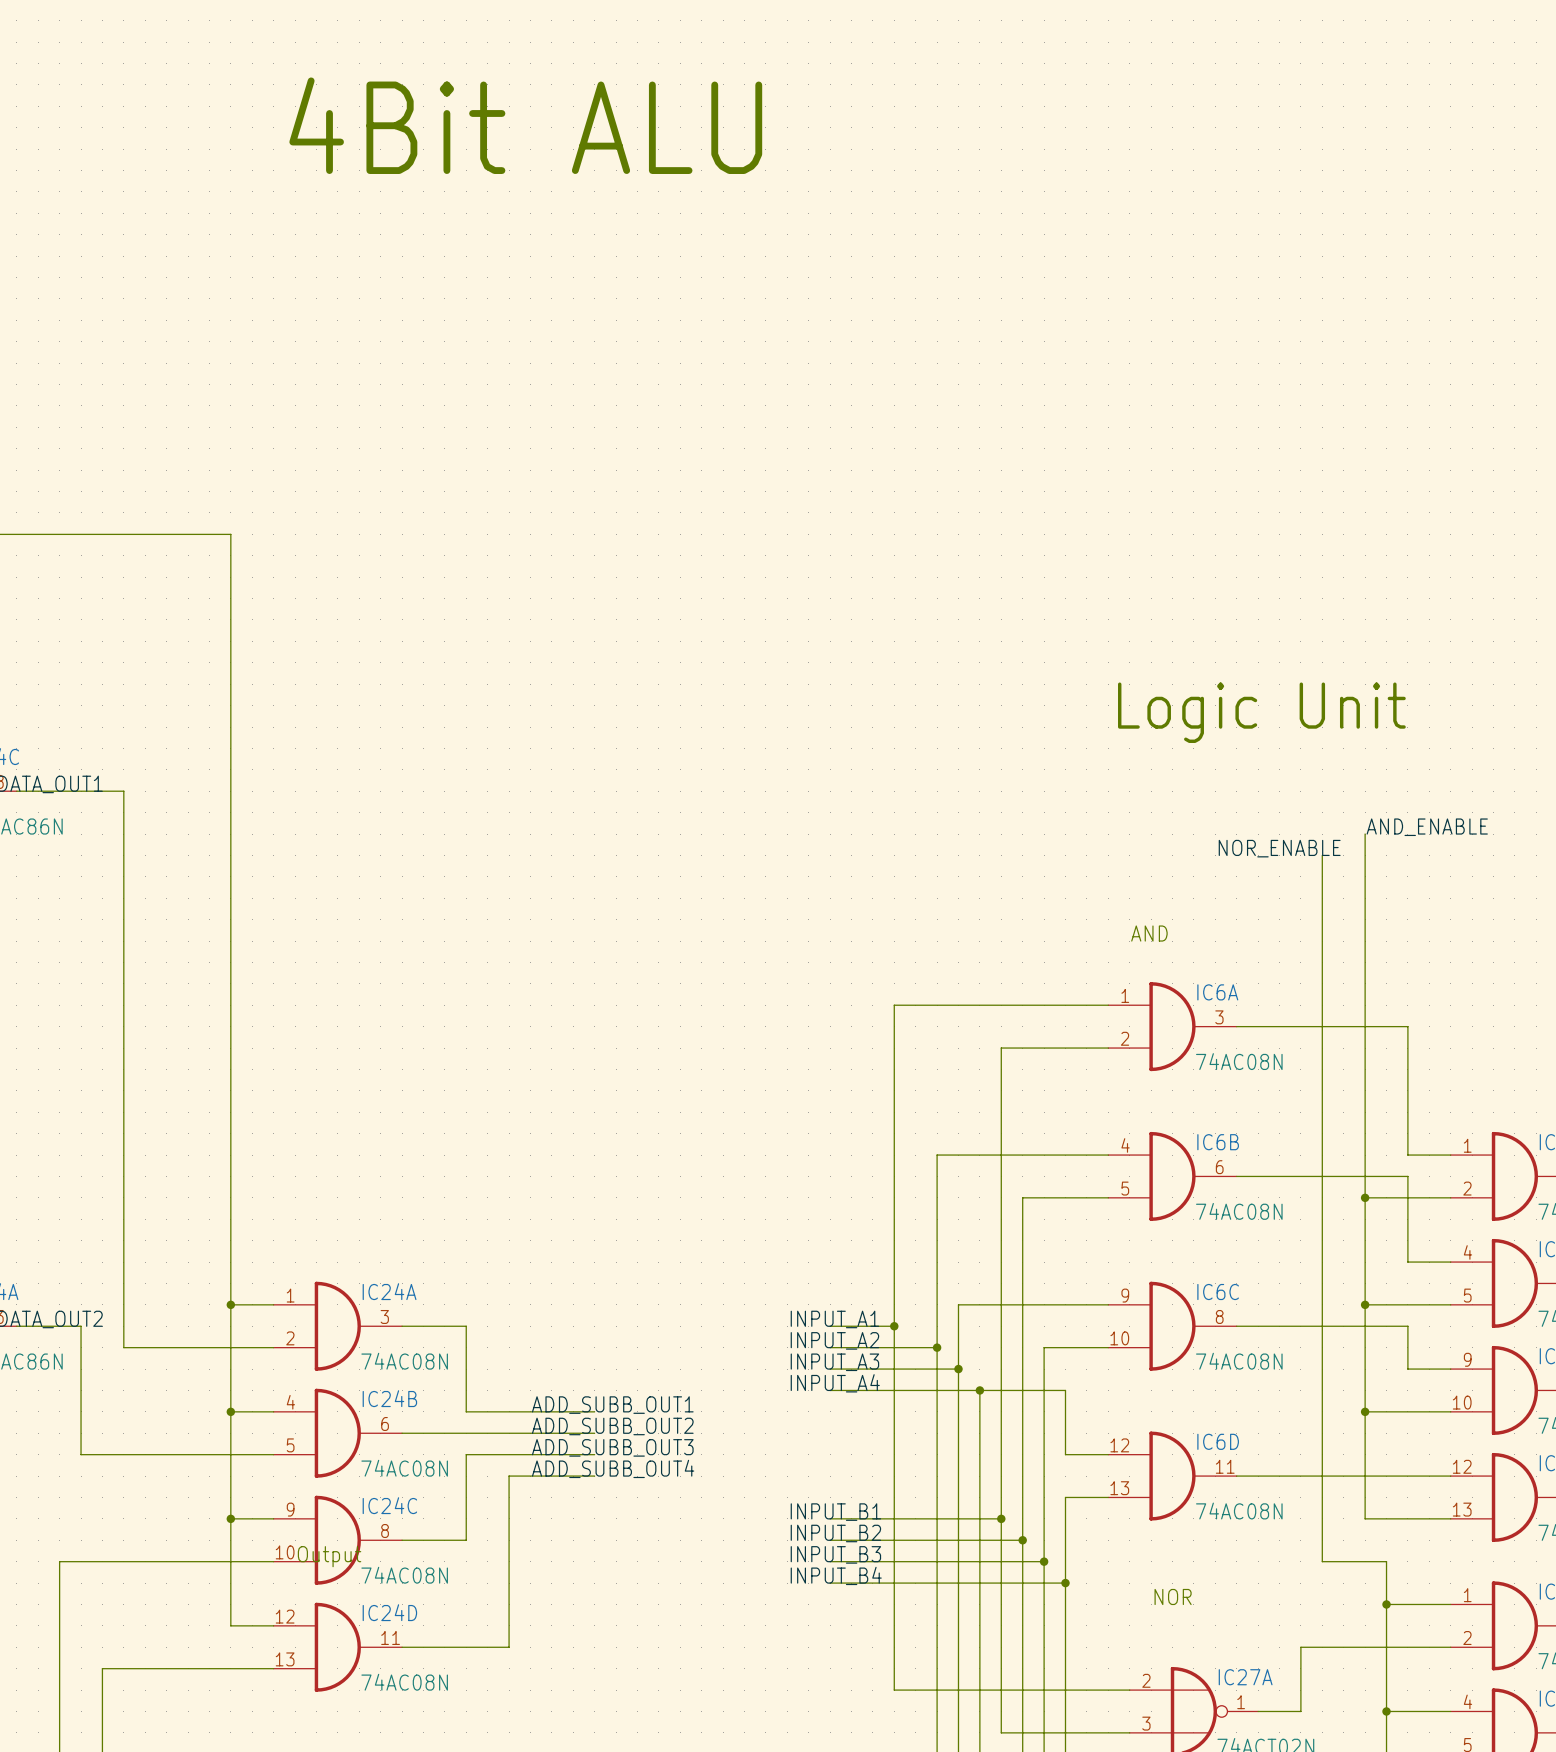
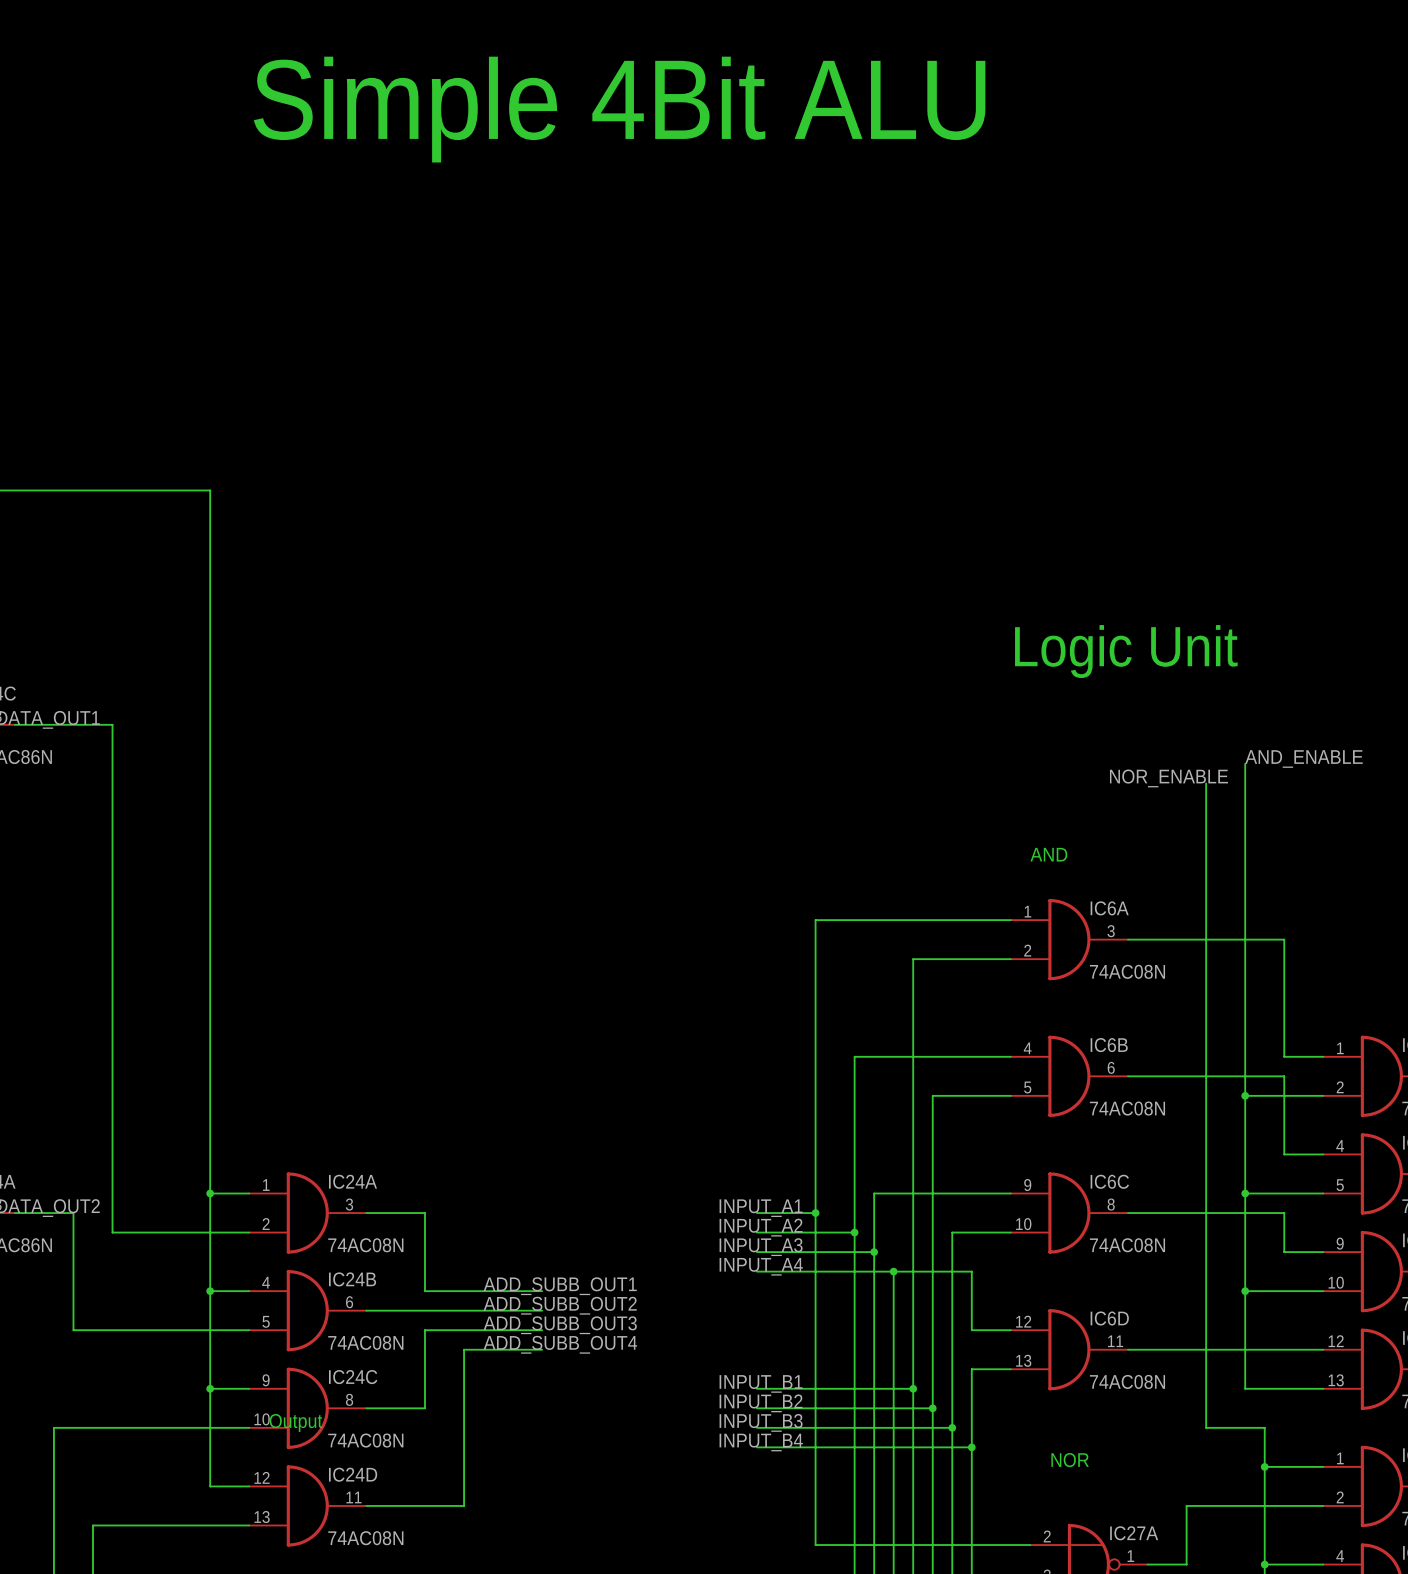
text: 4Bit ALU (525, 125) -> Simple 4Bit ALU (619, 109)

